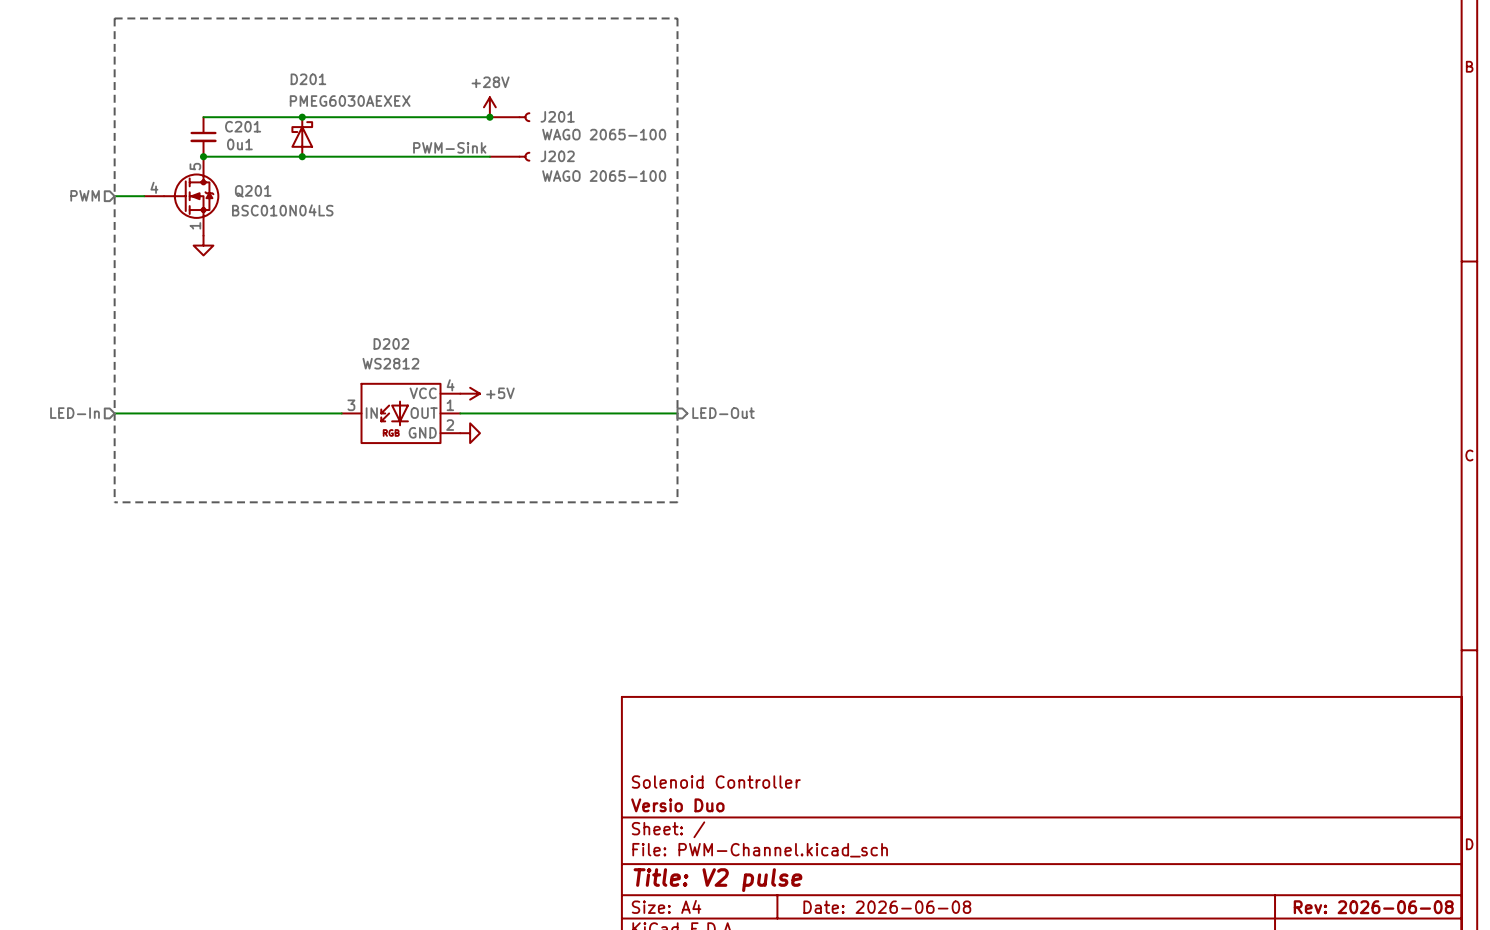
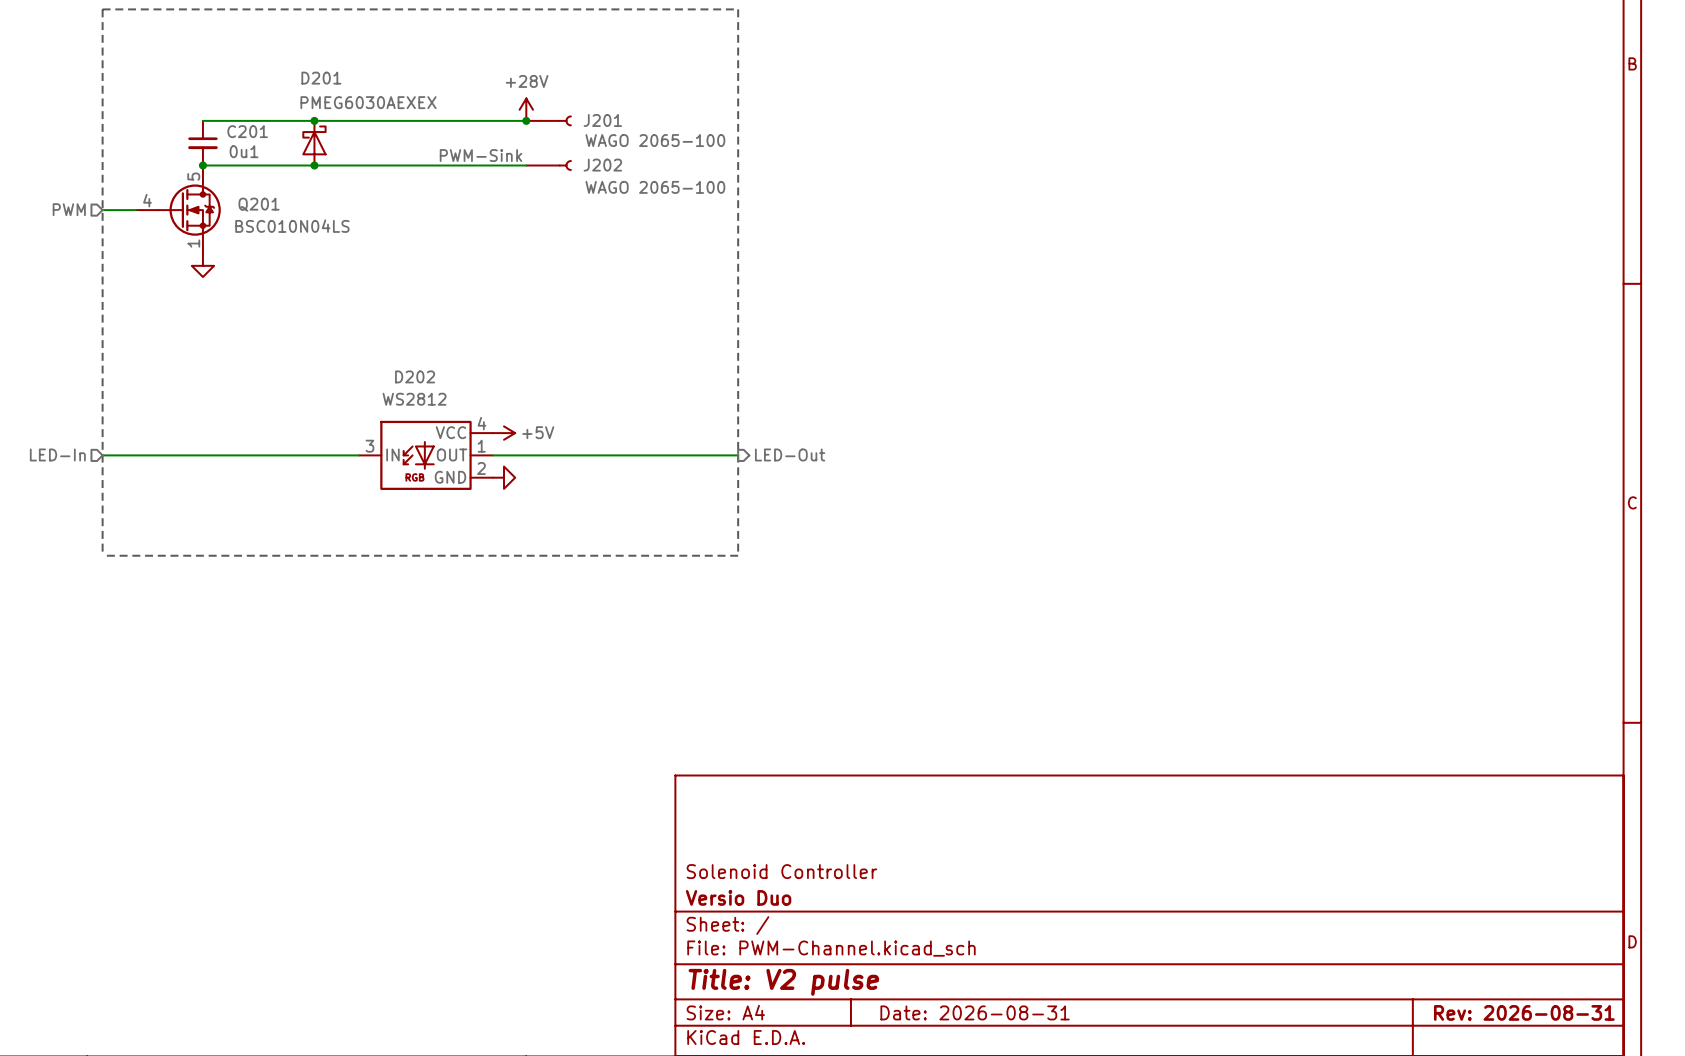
title block: Date: 2026-06-08 (887, 907) -> Date: 2026-08-31 (975, 1012)
title block: Rev: 2026-06-08 (1373, 907) -> Rev: 2026-08-31 (1524, 1012)

